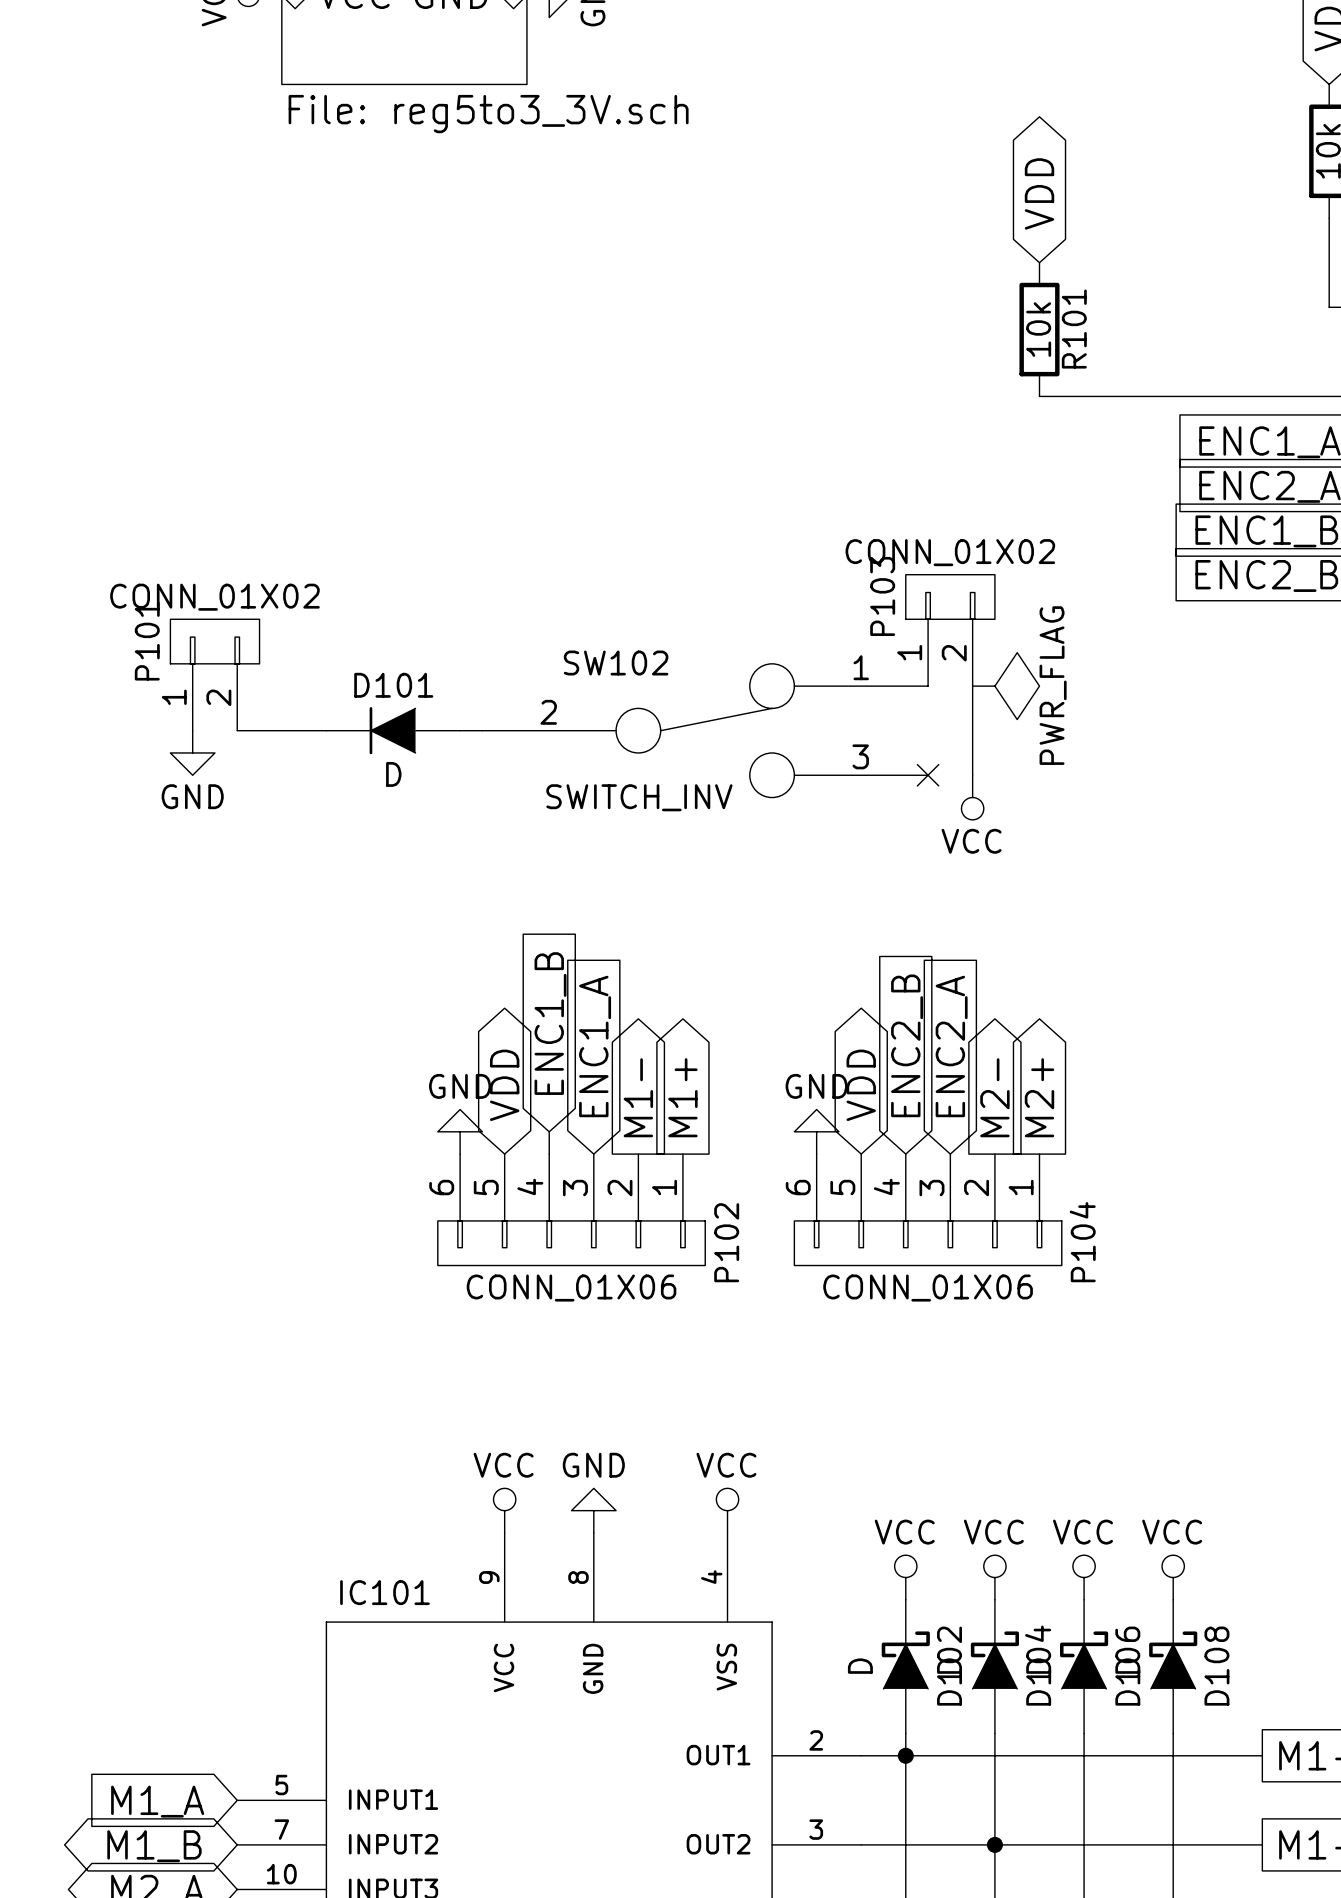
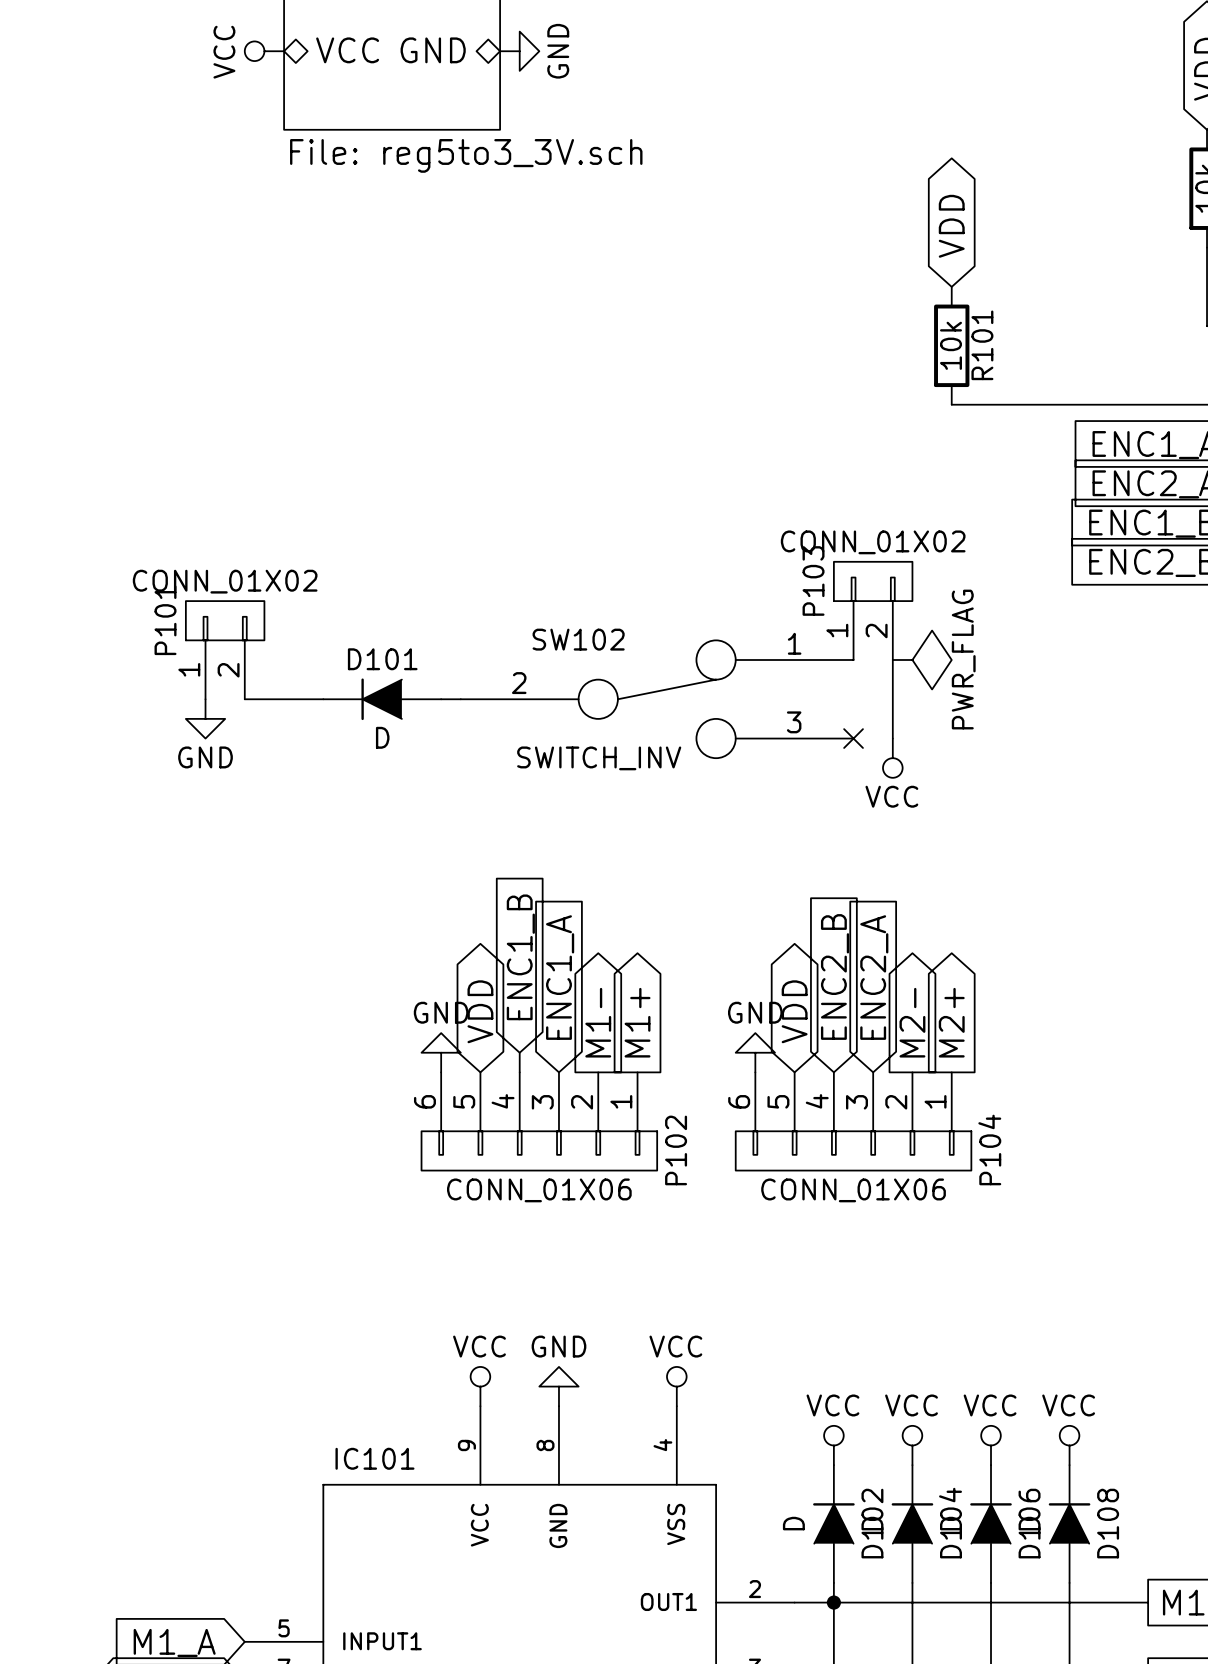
D102 symbol: [881, 1599, 930, 1734] -> [813, 1465, 855, 1583]
D104 symbol: [970, 1599, 1019, 1734] -> [891, 1465, 934, 1583]
D106 symbol: [1060, 1599, 1109, 1734] -> [970, 1465, 1012, 1583]
D108 symbol: [1149, 1599, 1198, 1734] -> [1048, 1465, 1091, 1583]

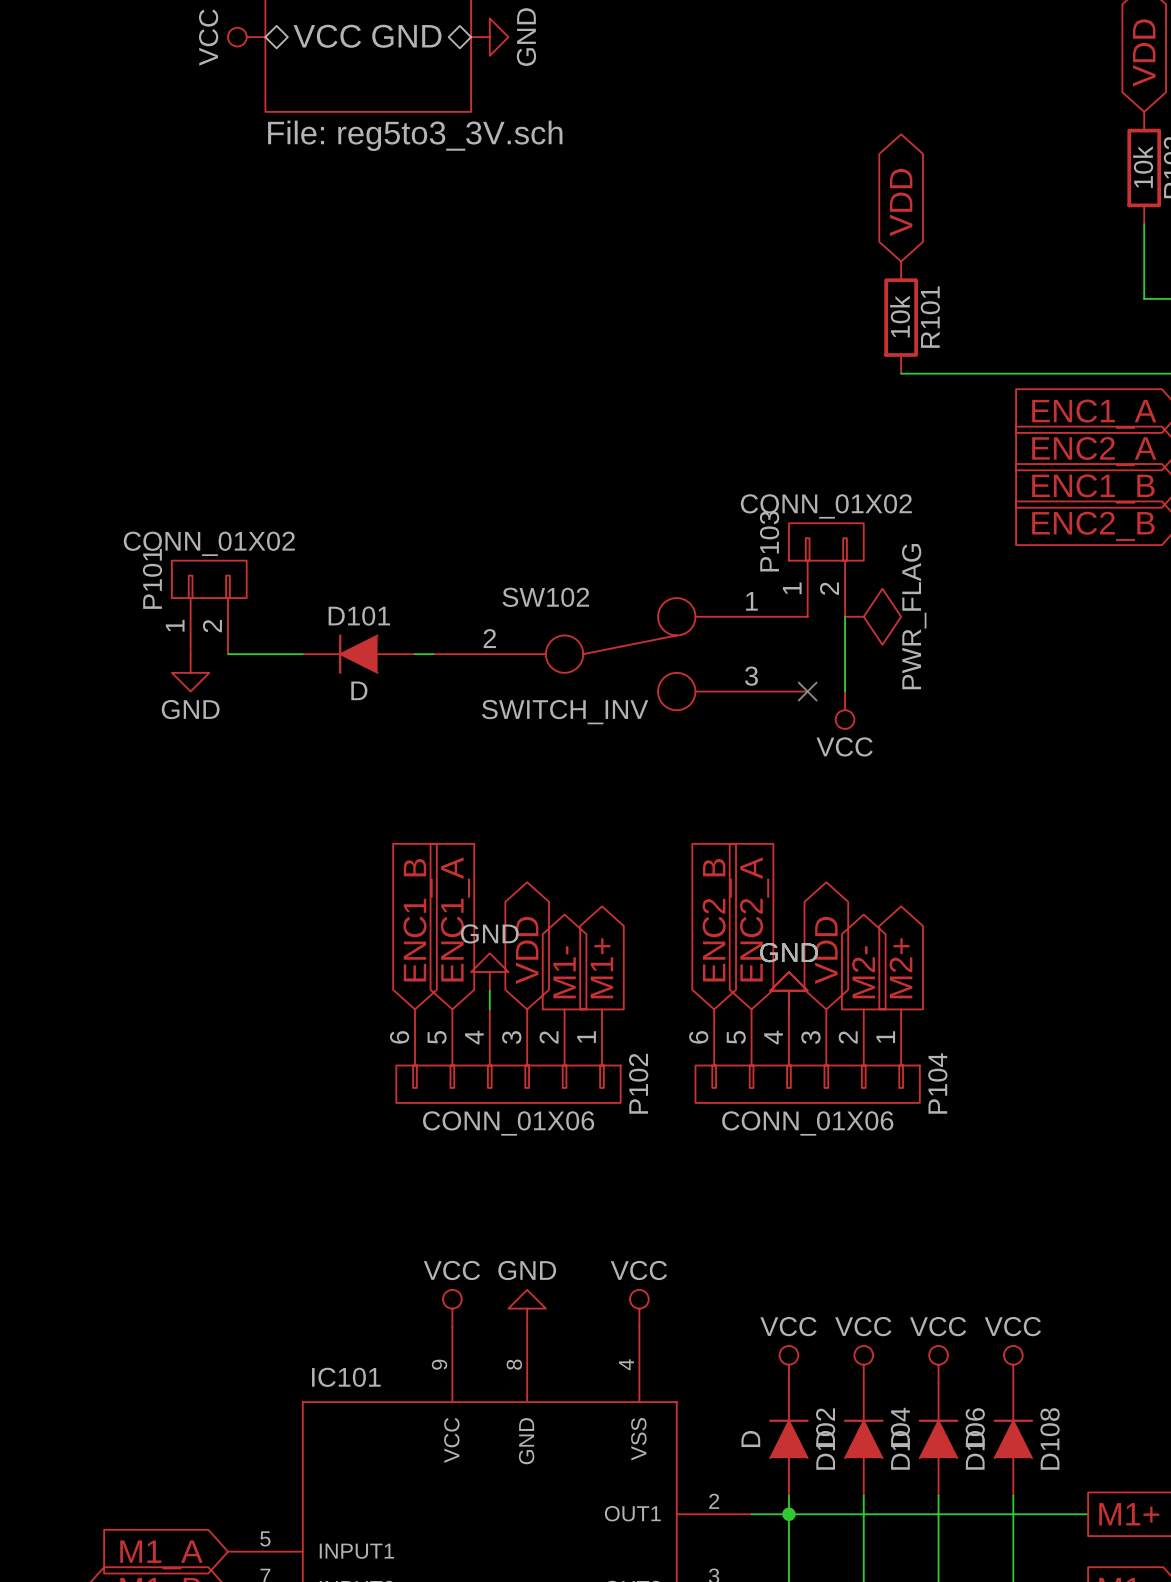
global label position: ENC1_B (520, 957) -> ENC1_B (418, 920)
global label position: ENC2_B (835, 976) -> ENC2_B (717, 920)
global label shape: input (560, 977) -> bidirectional (527, 950)
global label: ENC1_A (560, 977) -> VDD (527, 950)
global label shape: input (874, 977) -> bidirectional (826, 950)
global label: ENC2_A (874, 977) -> VDD (826, 950)
global label shape: bidirectional (480, 1011) -> input (455, 919)
global label: VDD (480, 1011) -> ENC1_A (455, 919)
global label shape: bidirectional (794, 1011) -> input (754, 919)
global label: VDD (794, 1011) -> ENC2_A (754, 919)
power symbol position: GND (441, 1052) -> GND (489, 972)
power symbol position: GND (755, 1052) -> GND (788, 990)

